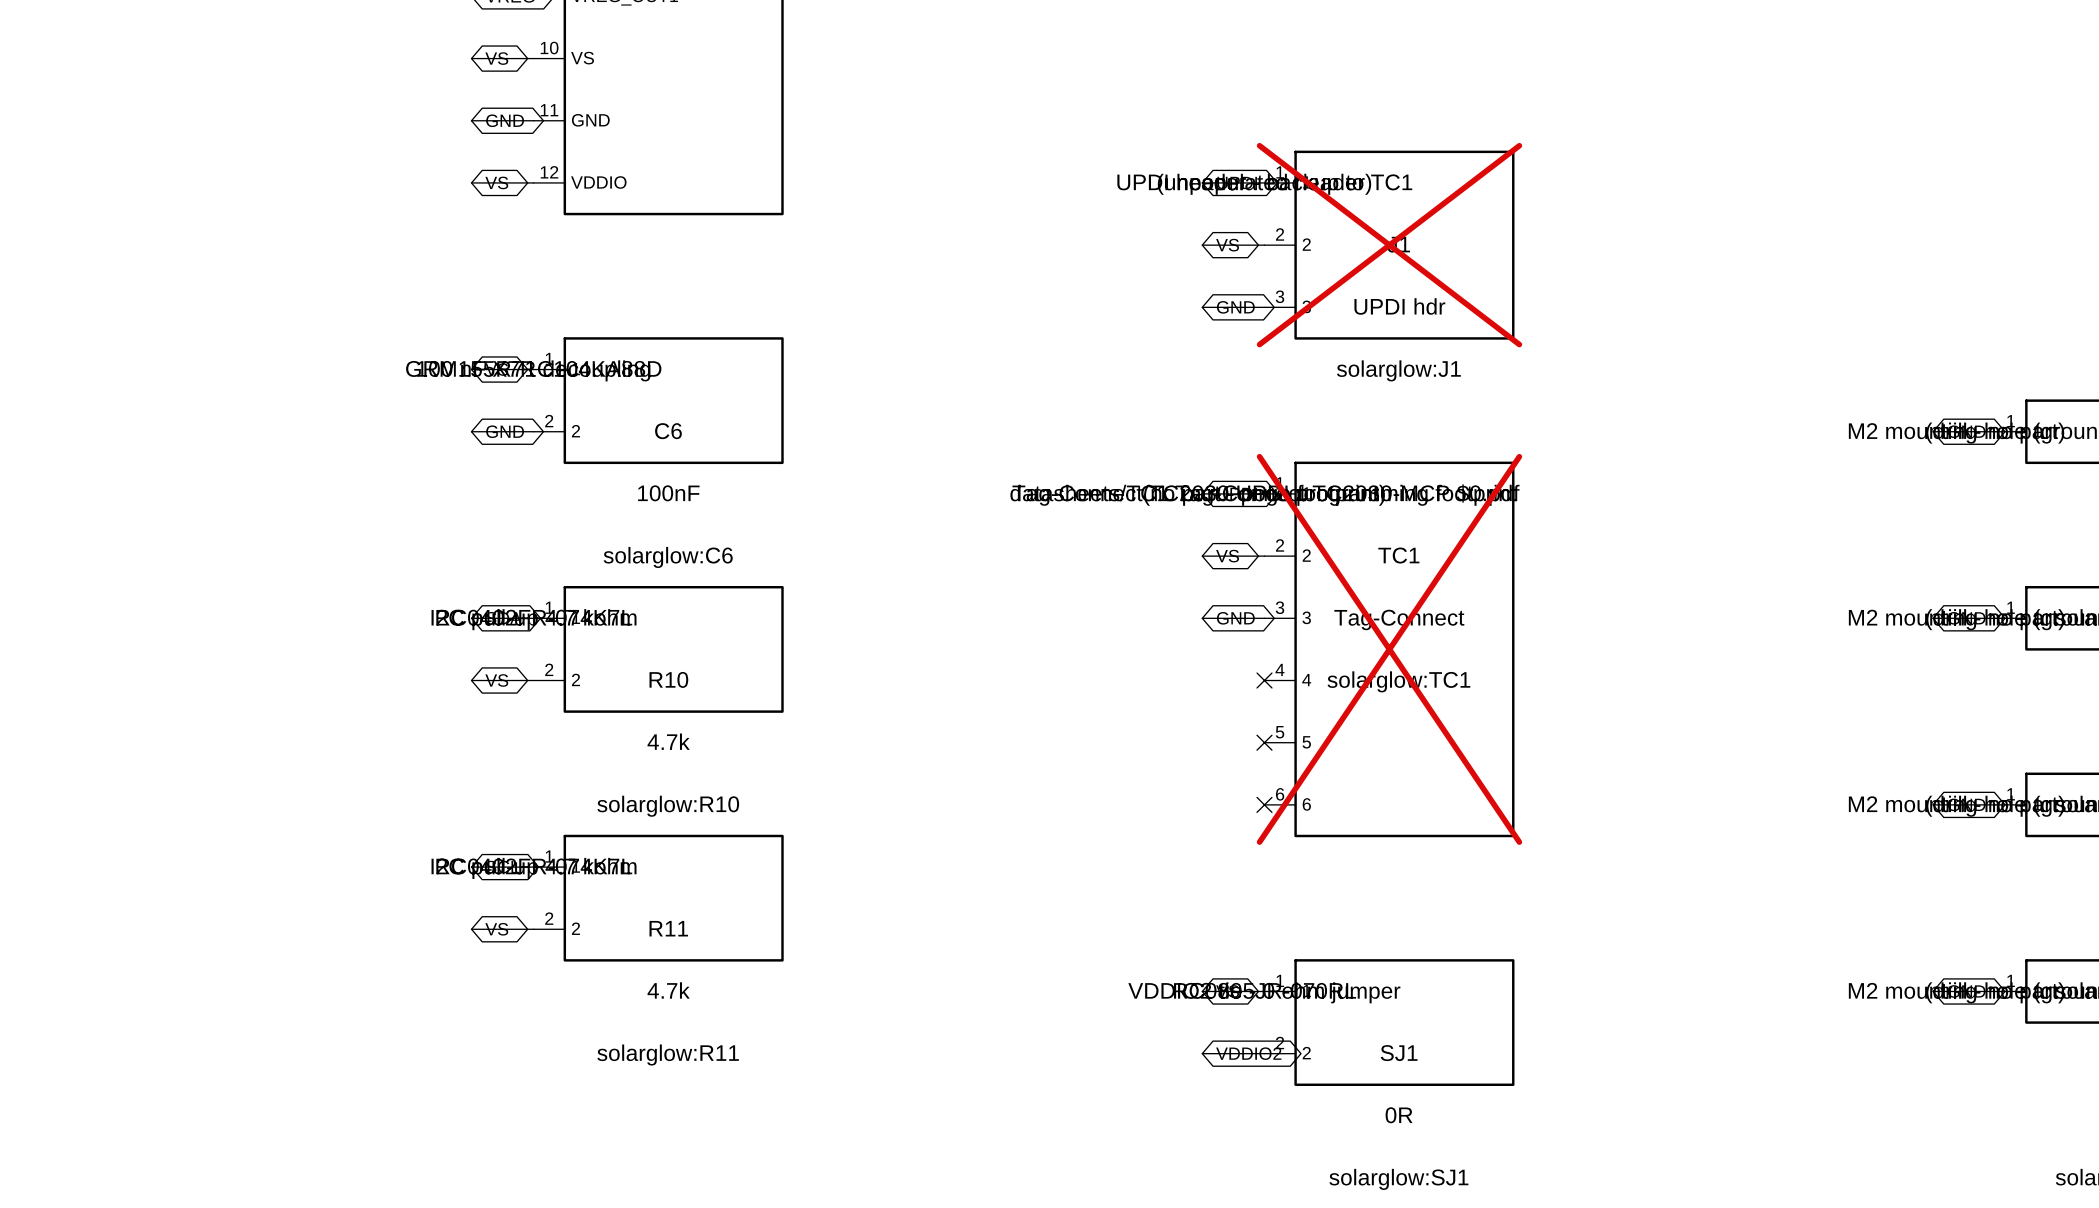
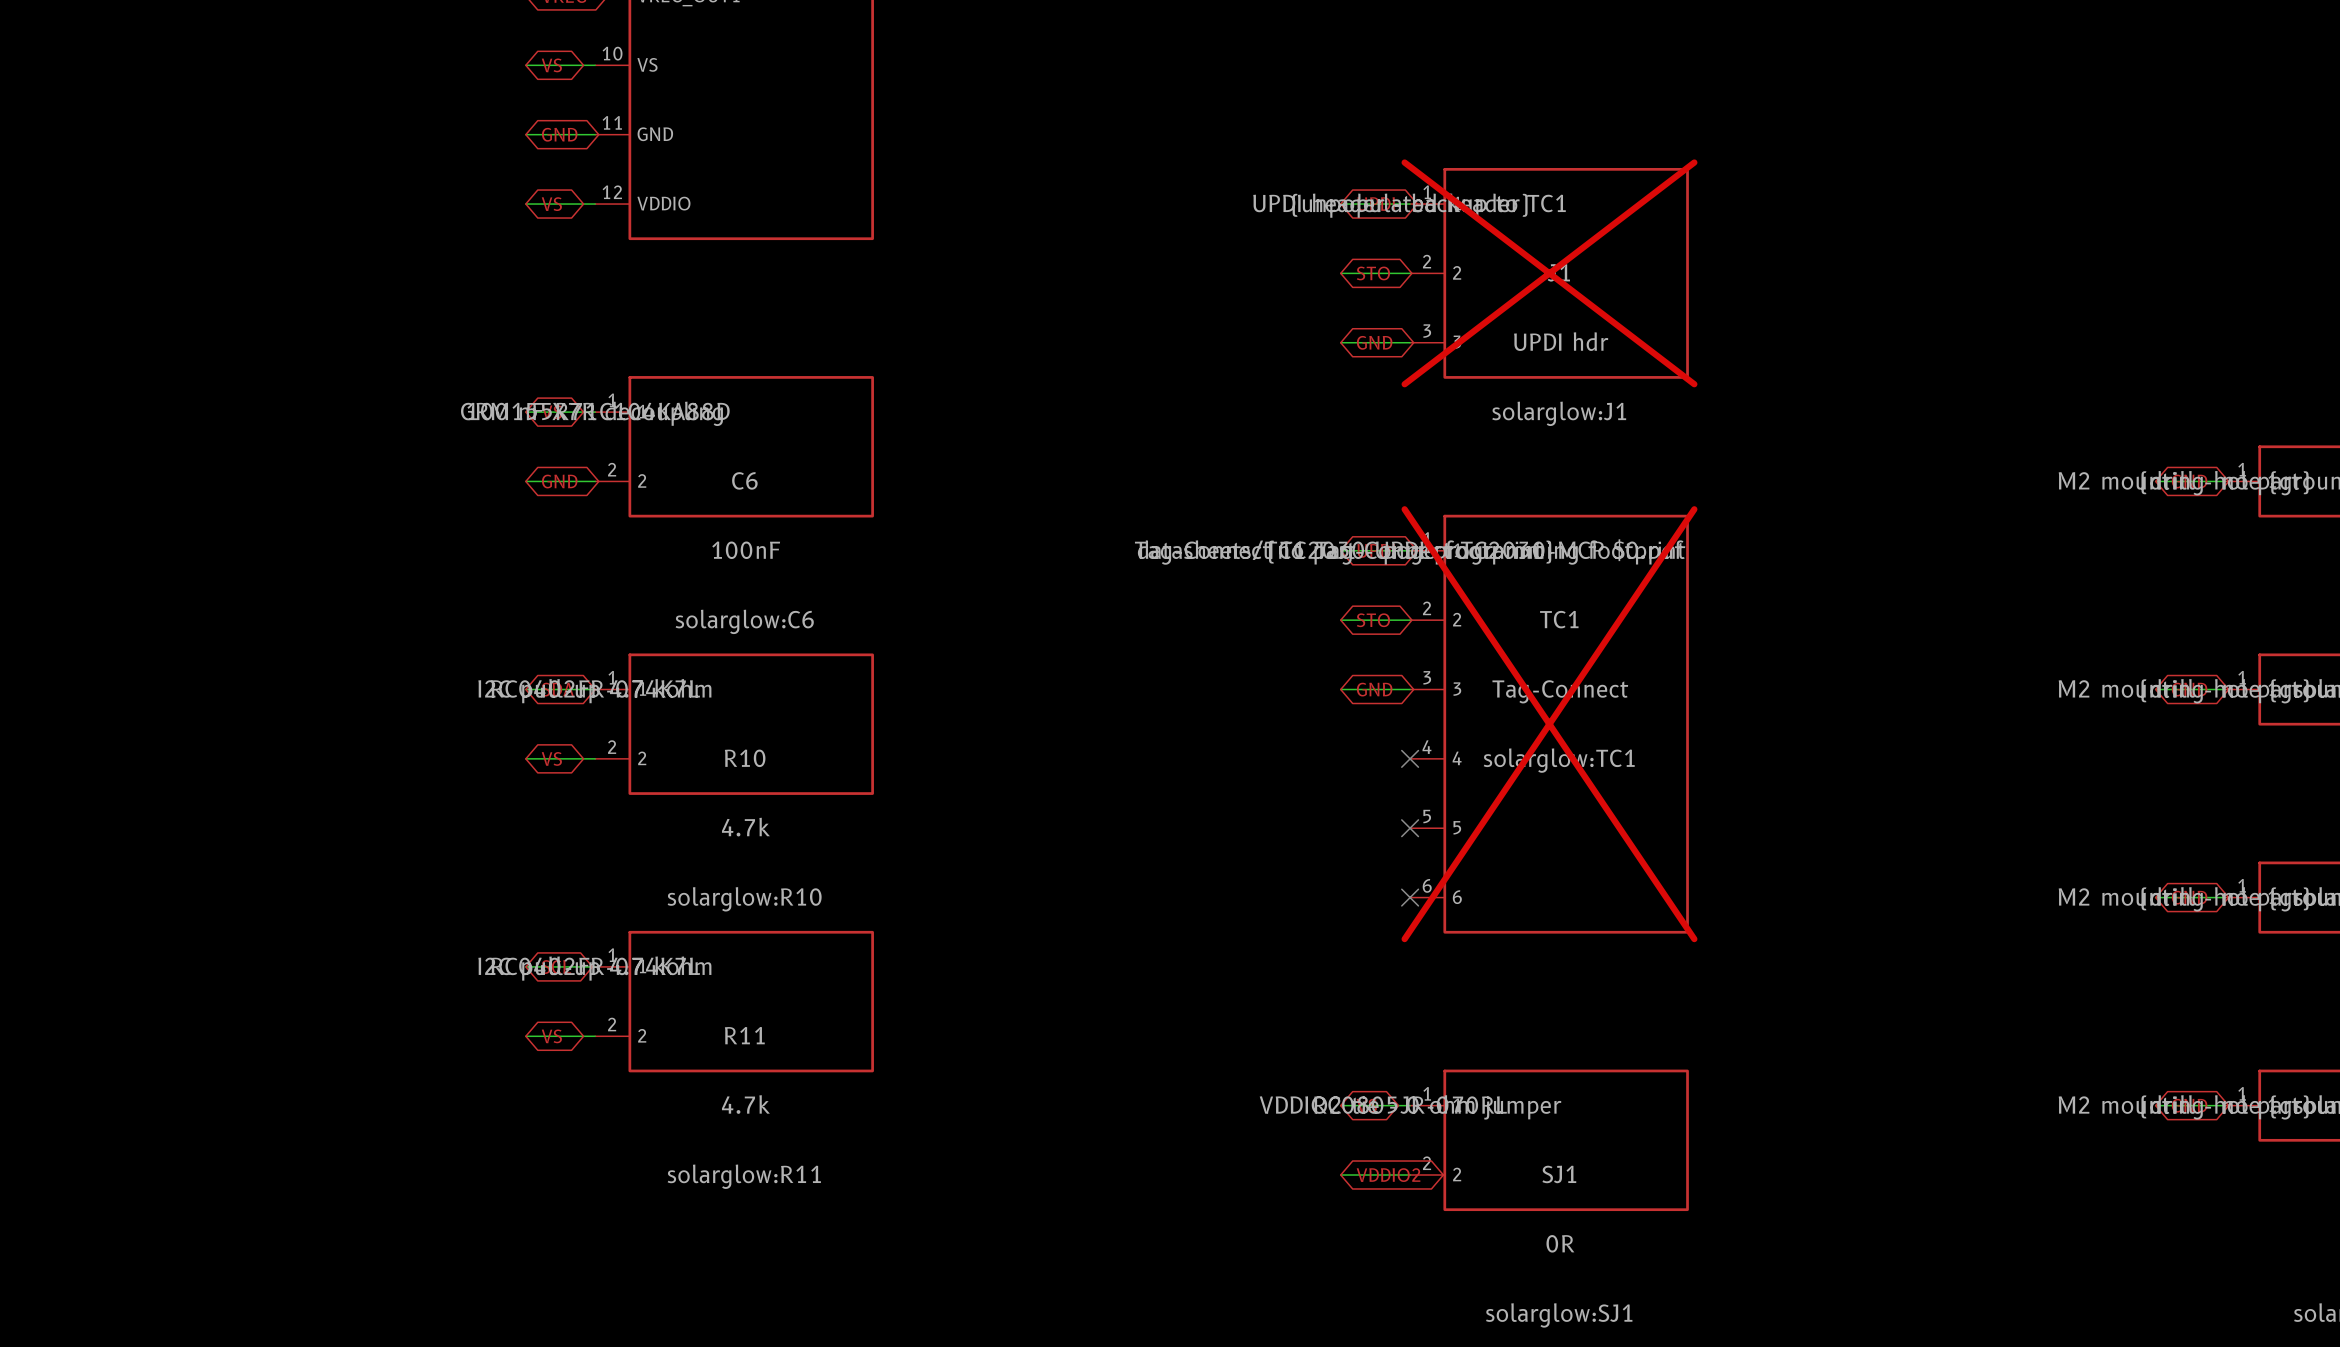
global label: VS (1227, 245) -> STO (1373, 273)
global label: VS (1227, 556) -> STO (1373, 620)

